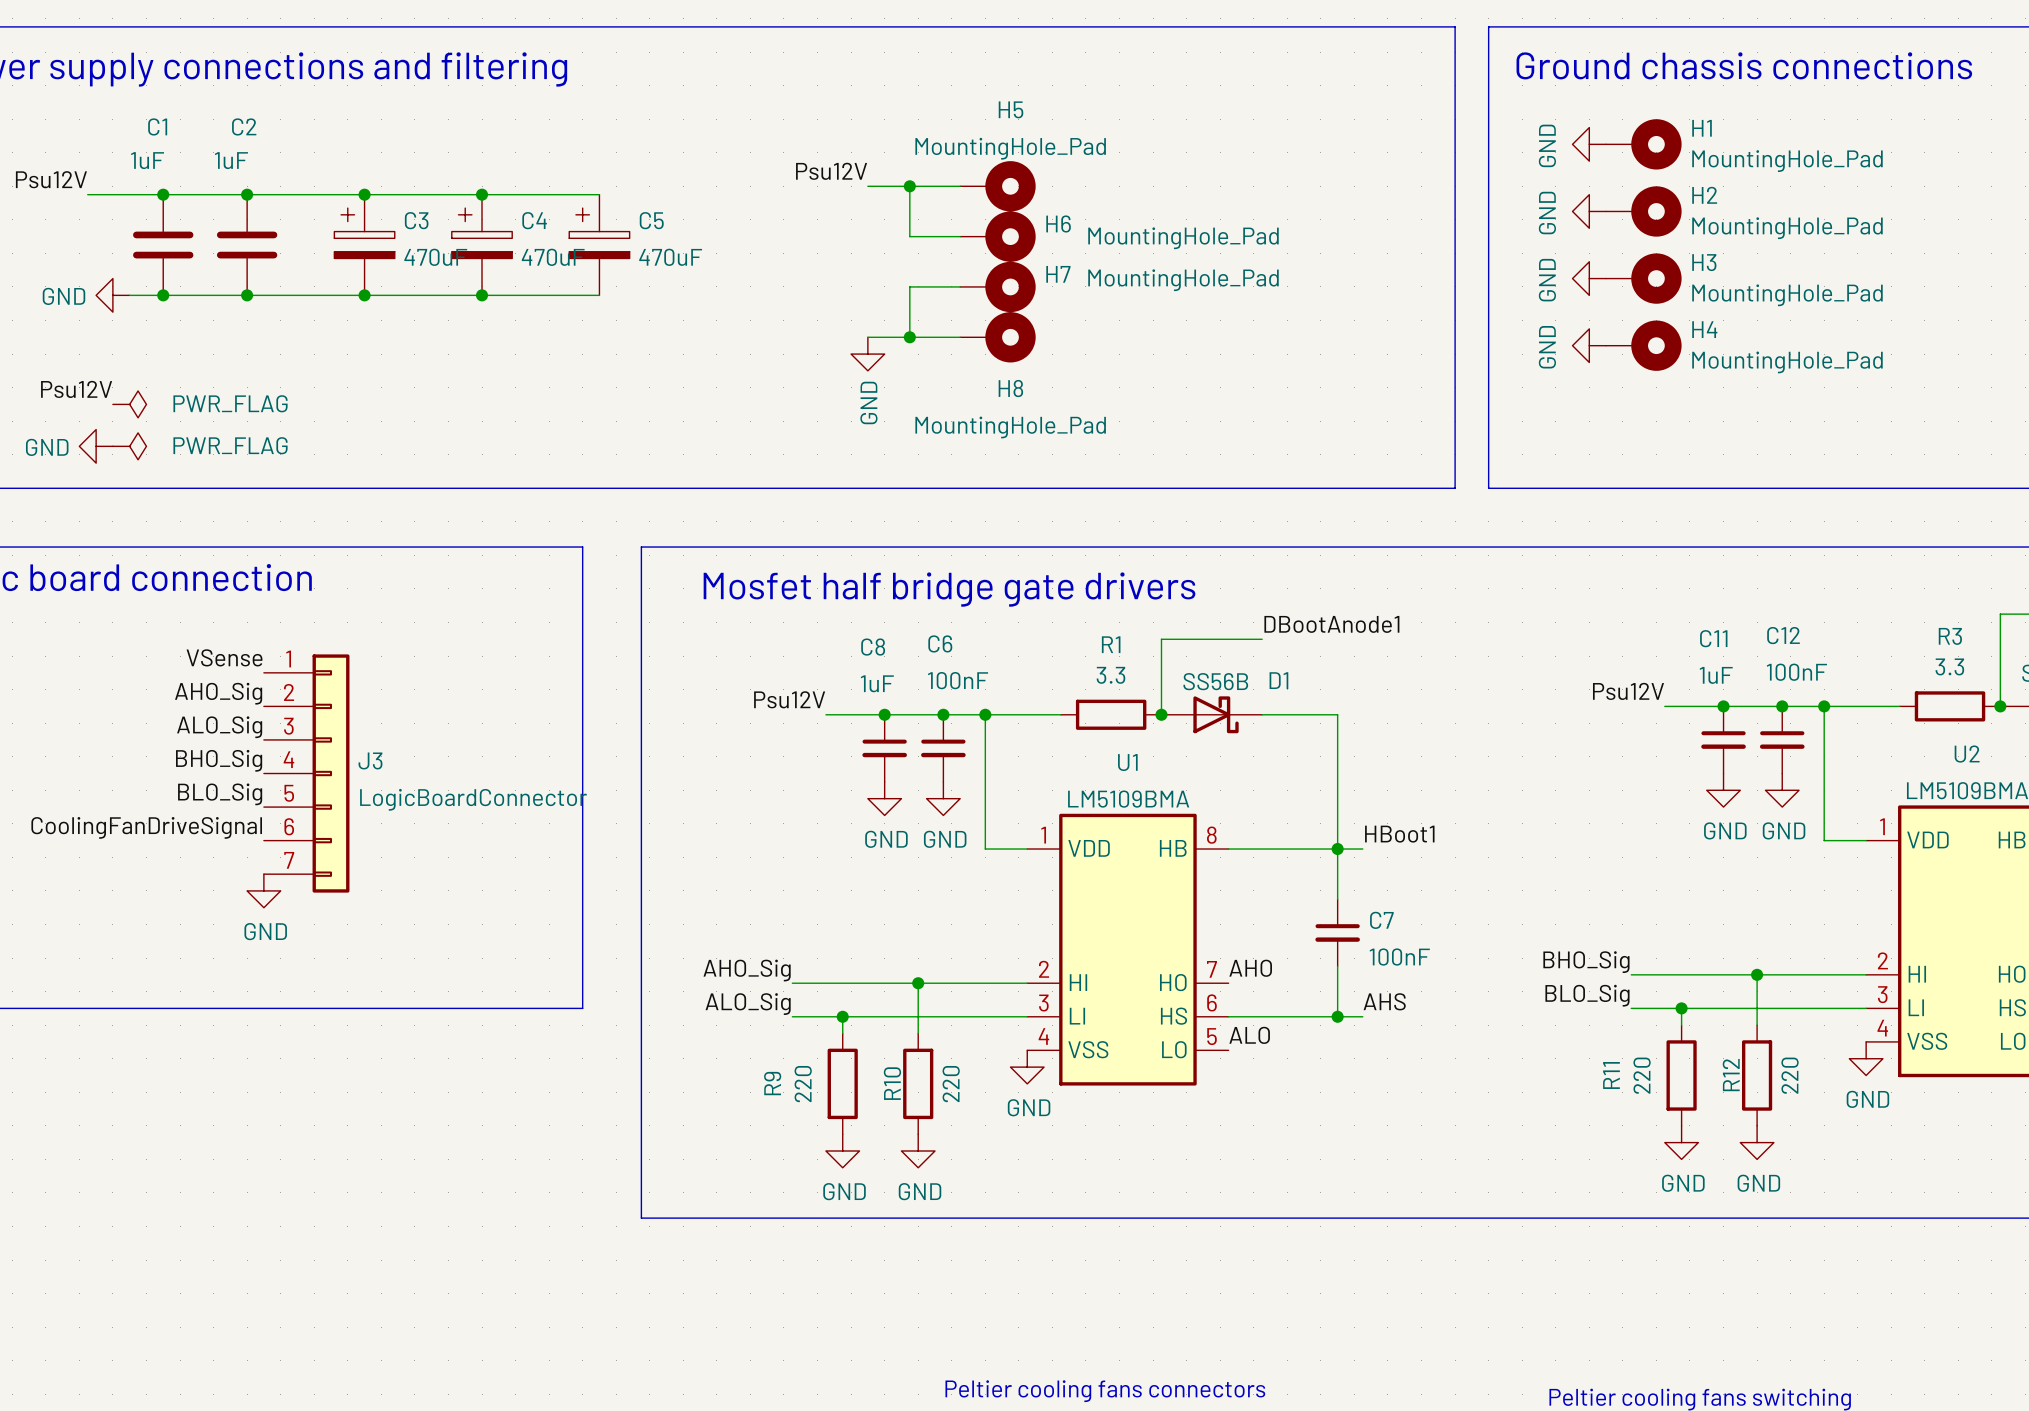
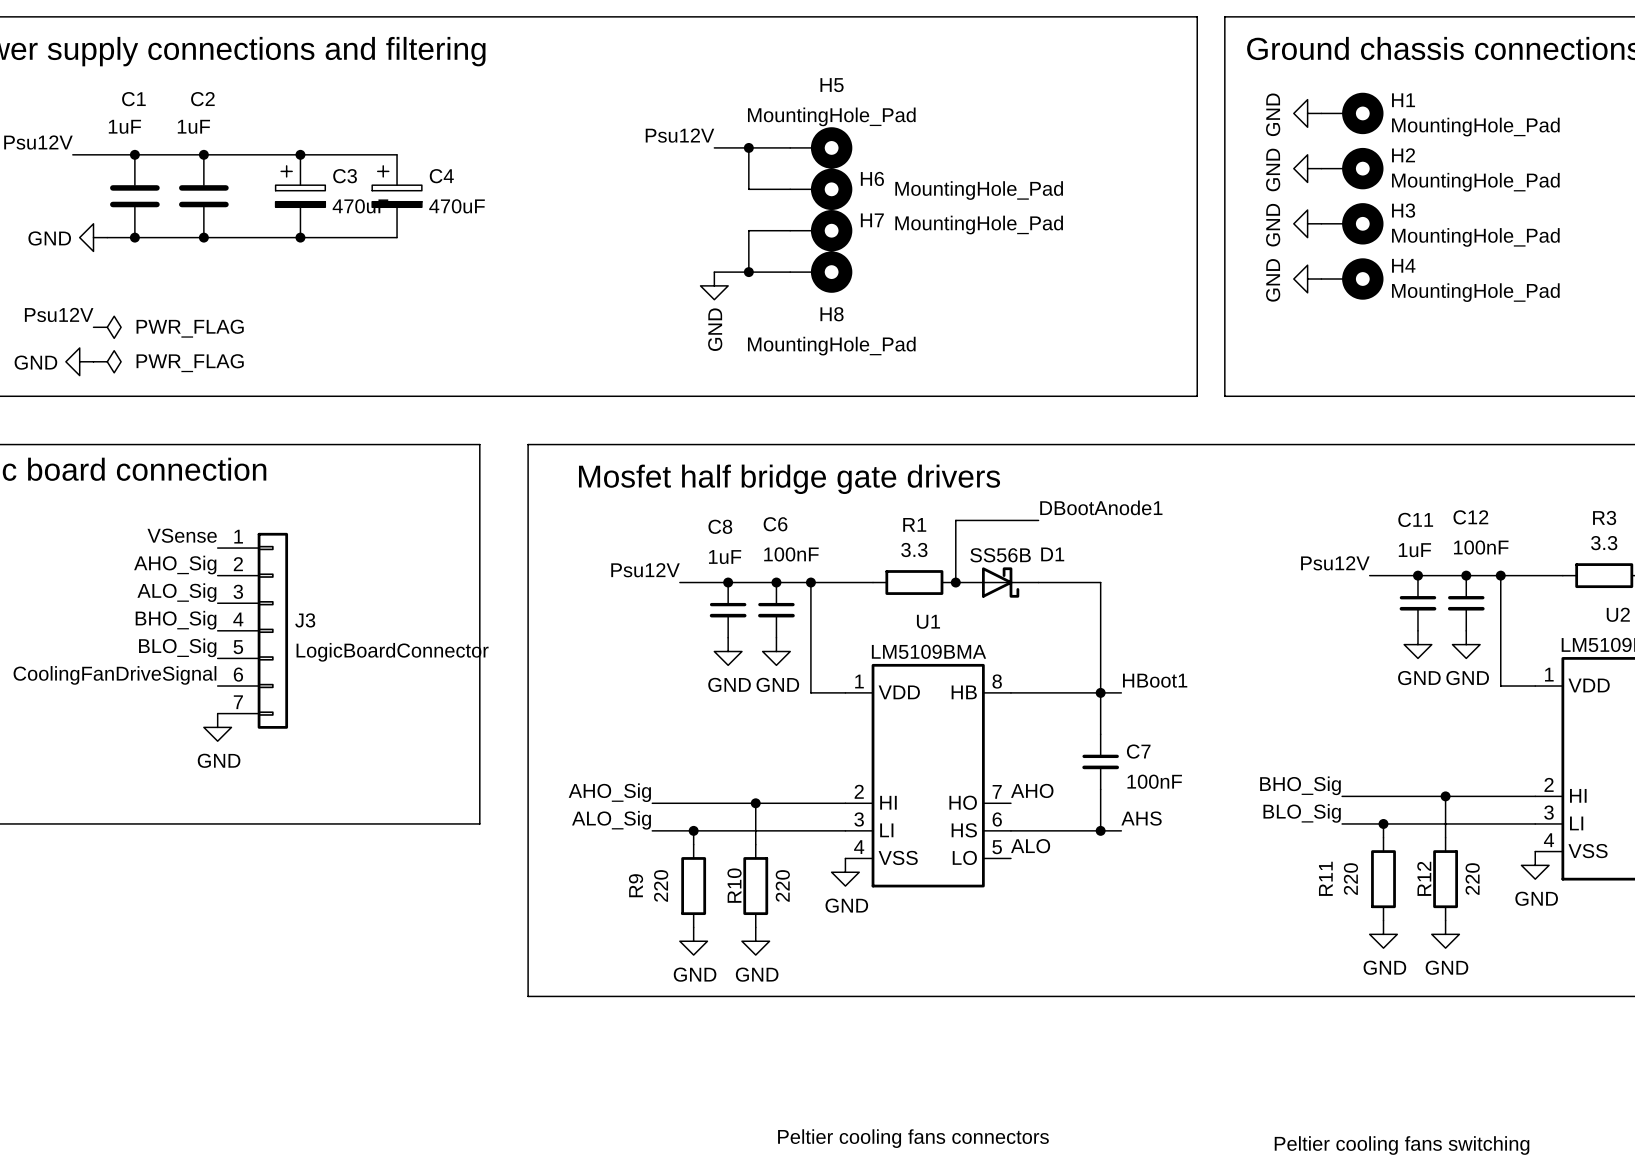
wire: (482, 194) (599, 194) -> none
junction: (482, 194) -> none
C5: 470uF (599, 245) -> none
wire: (482, 295) (599, 295) -> none
junction: (482, 295) -> none

